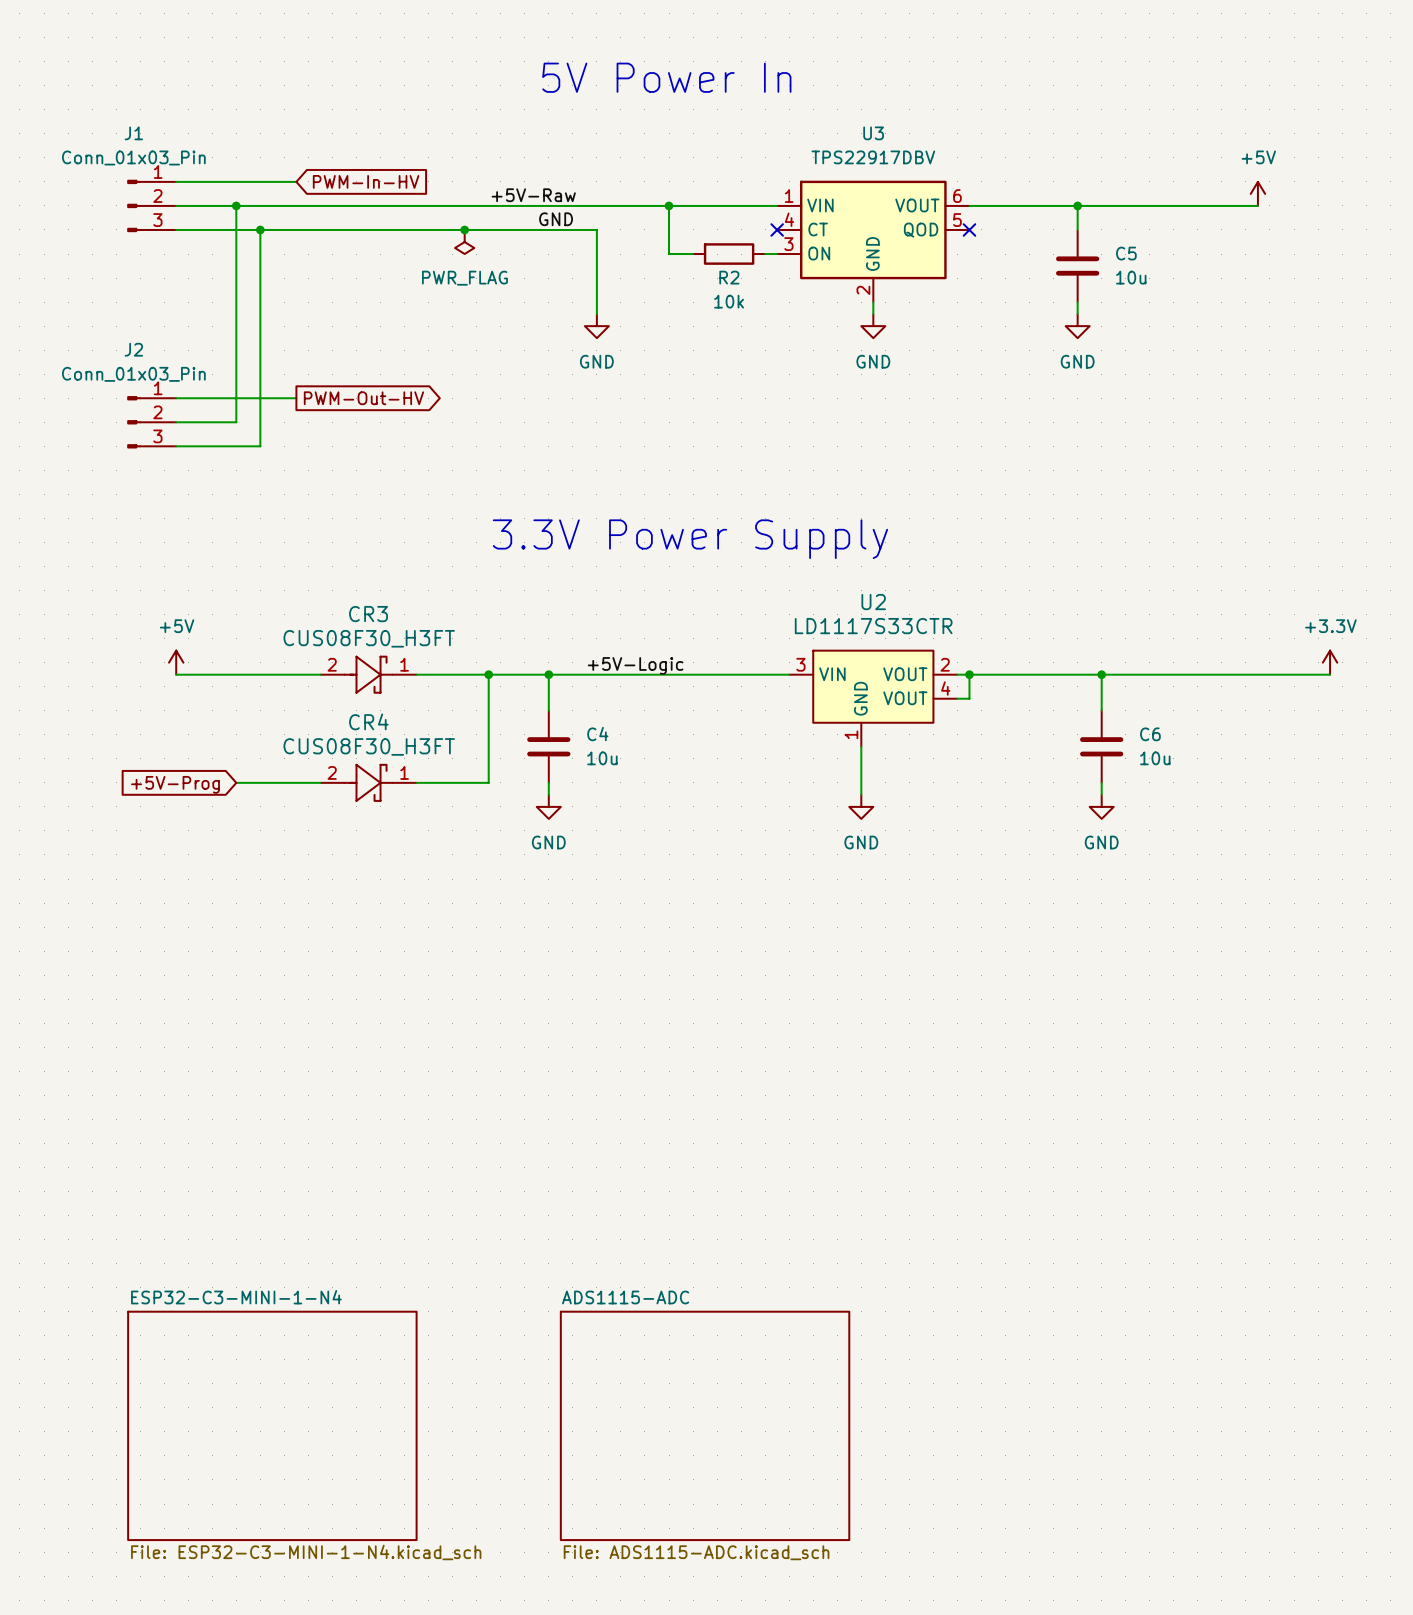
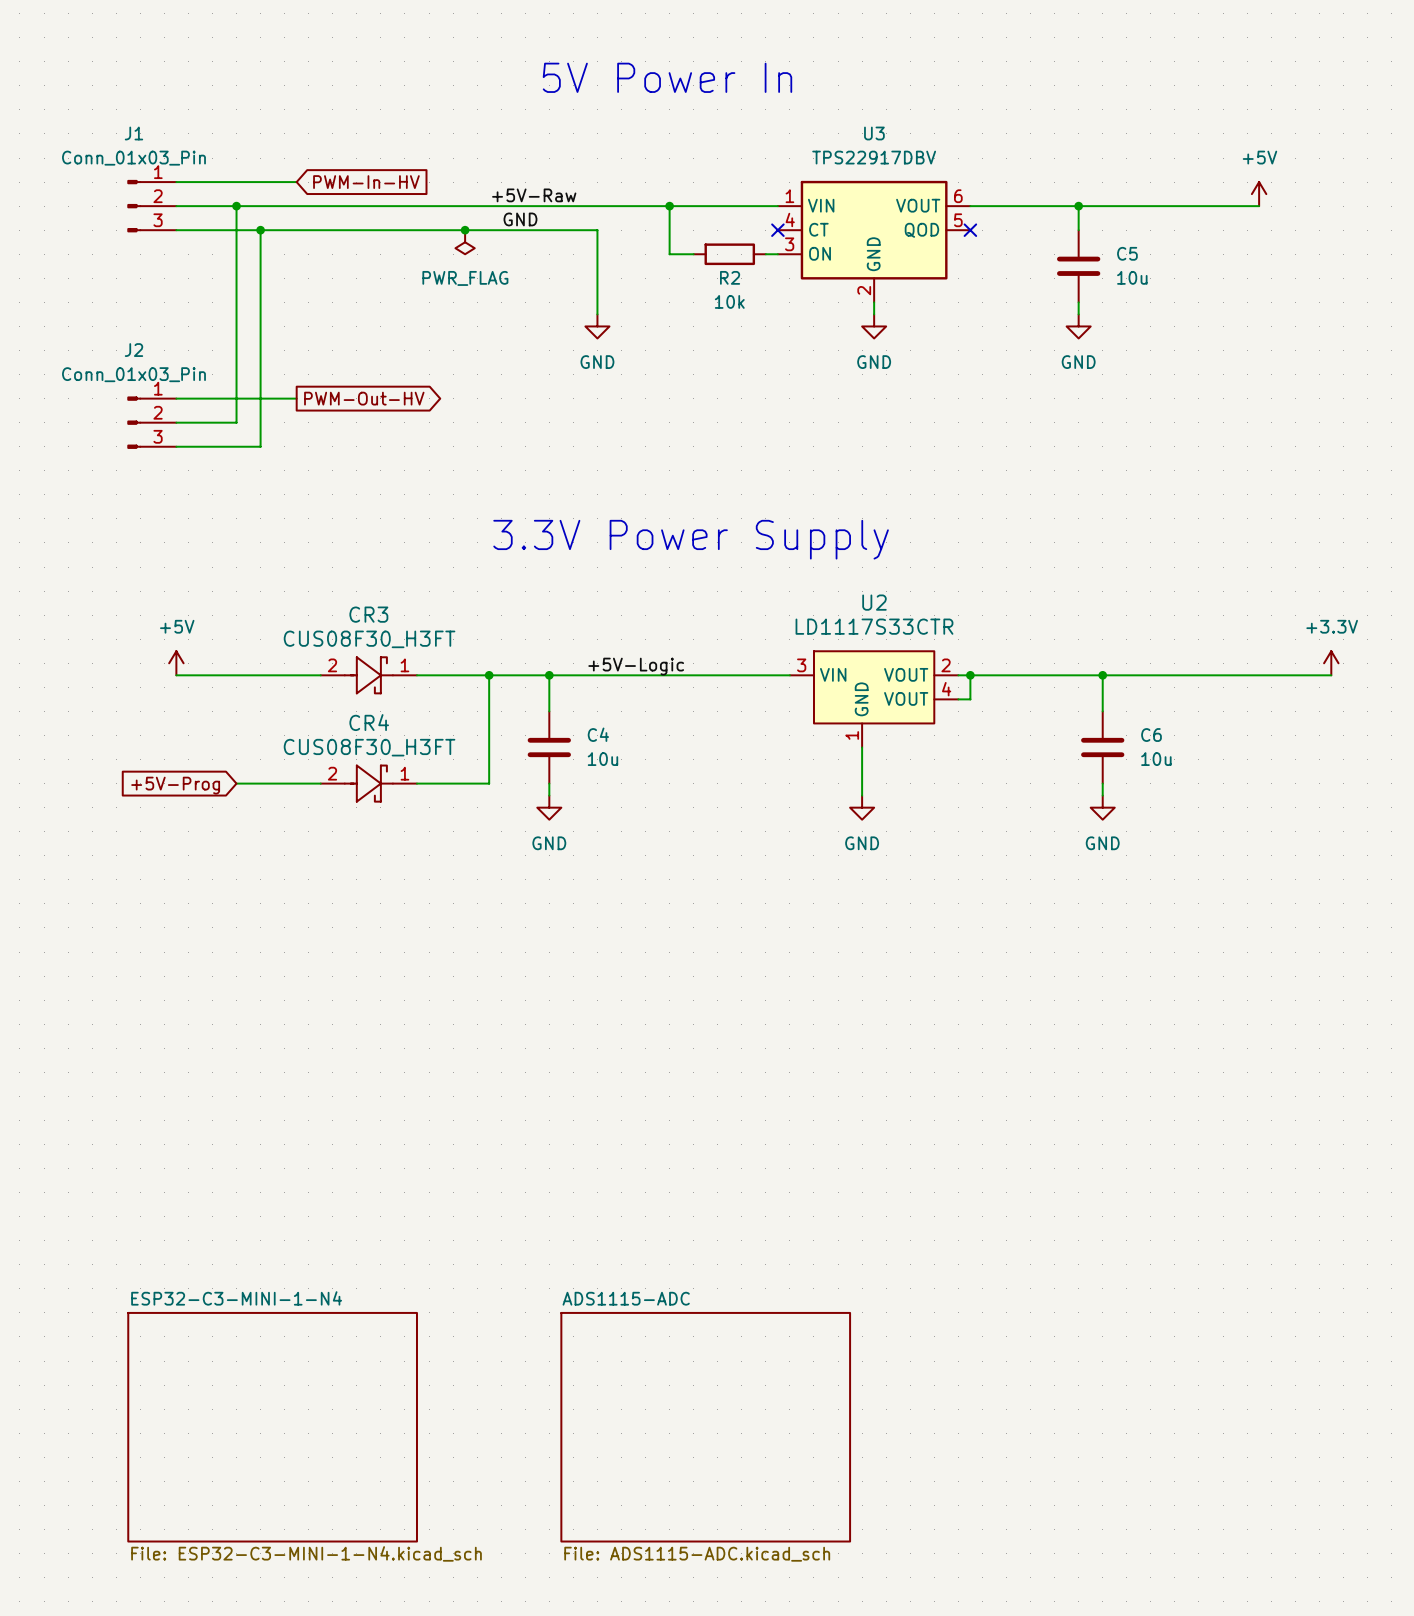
label position: GND (556, 219) -> GND (520, 219)

